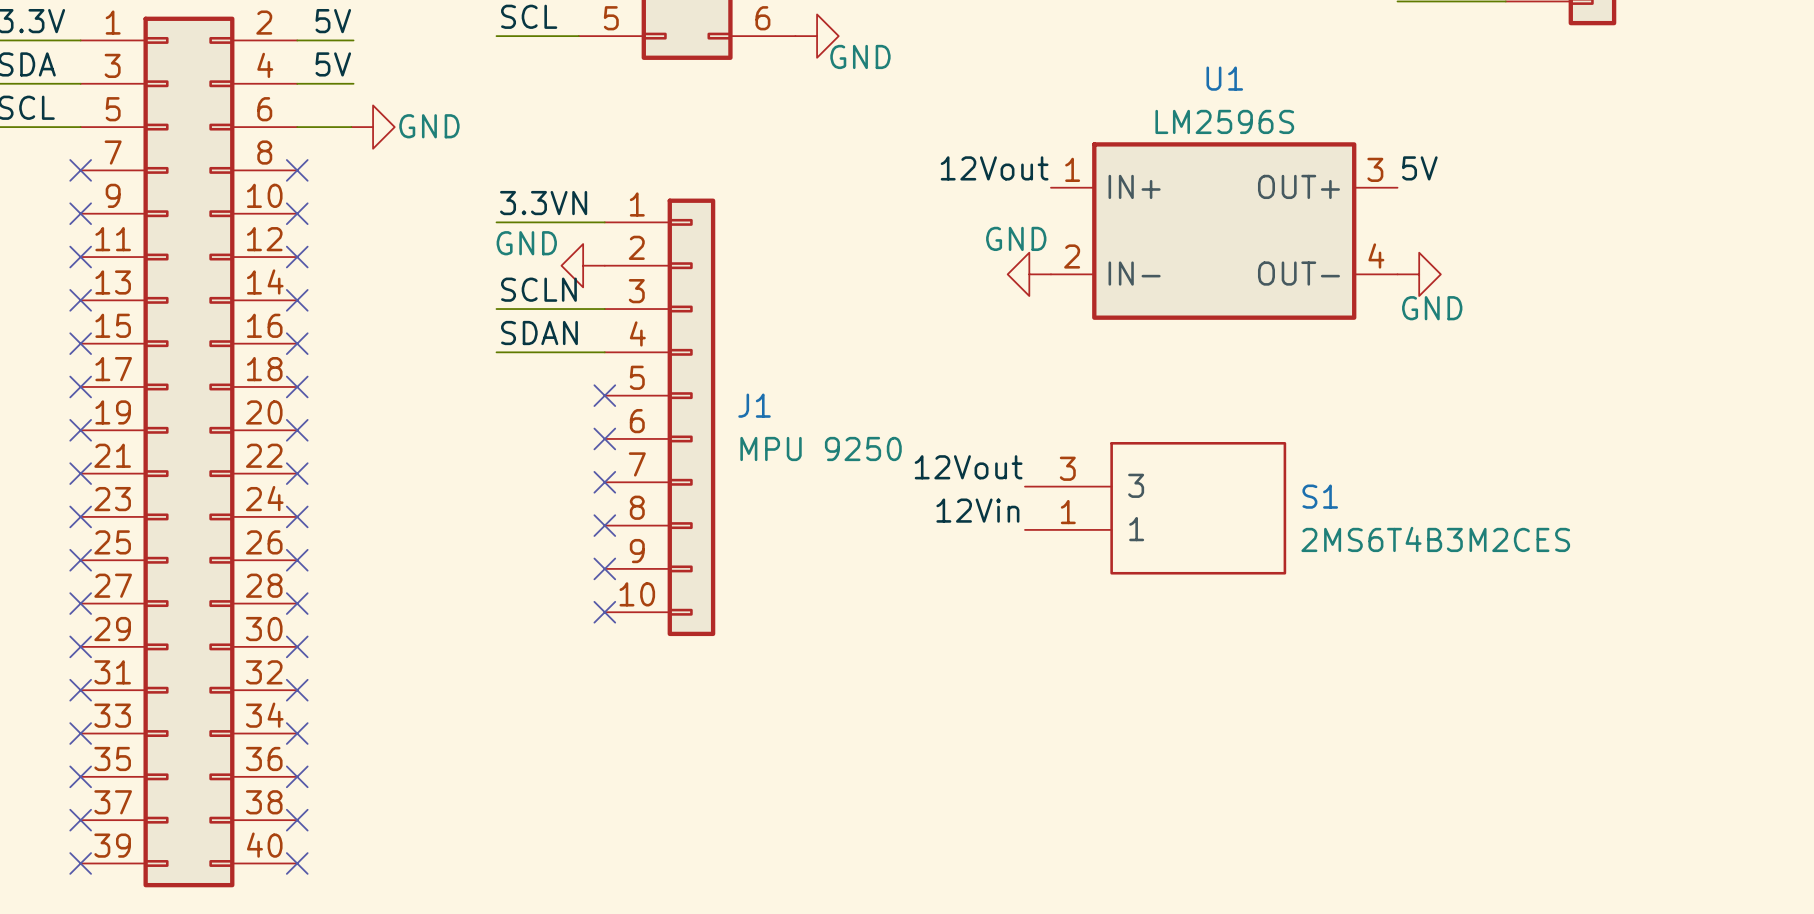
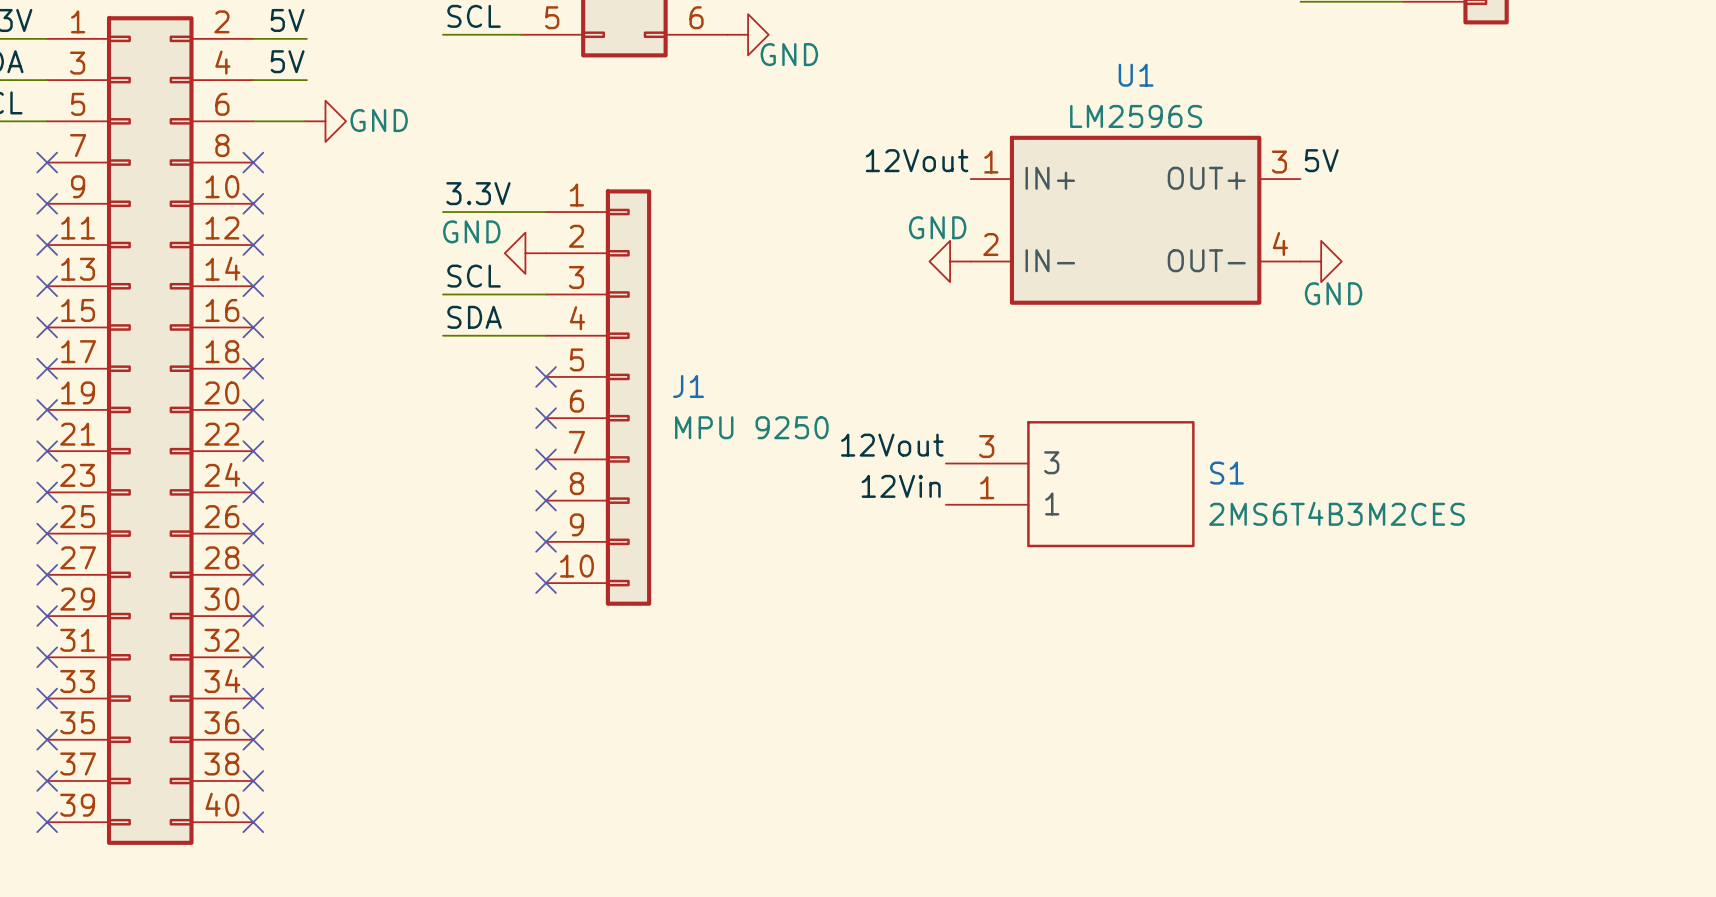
label: 3.3VN (543, 203) -> 3.3V (478, 193)
label: SCLN (538, 289) -> SCL (474, 276)
label: SDAN (539, 333) -> SDA (474, 317)

